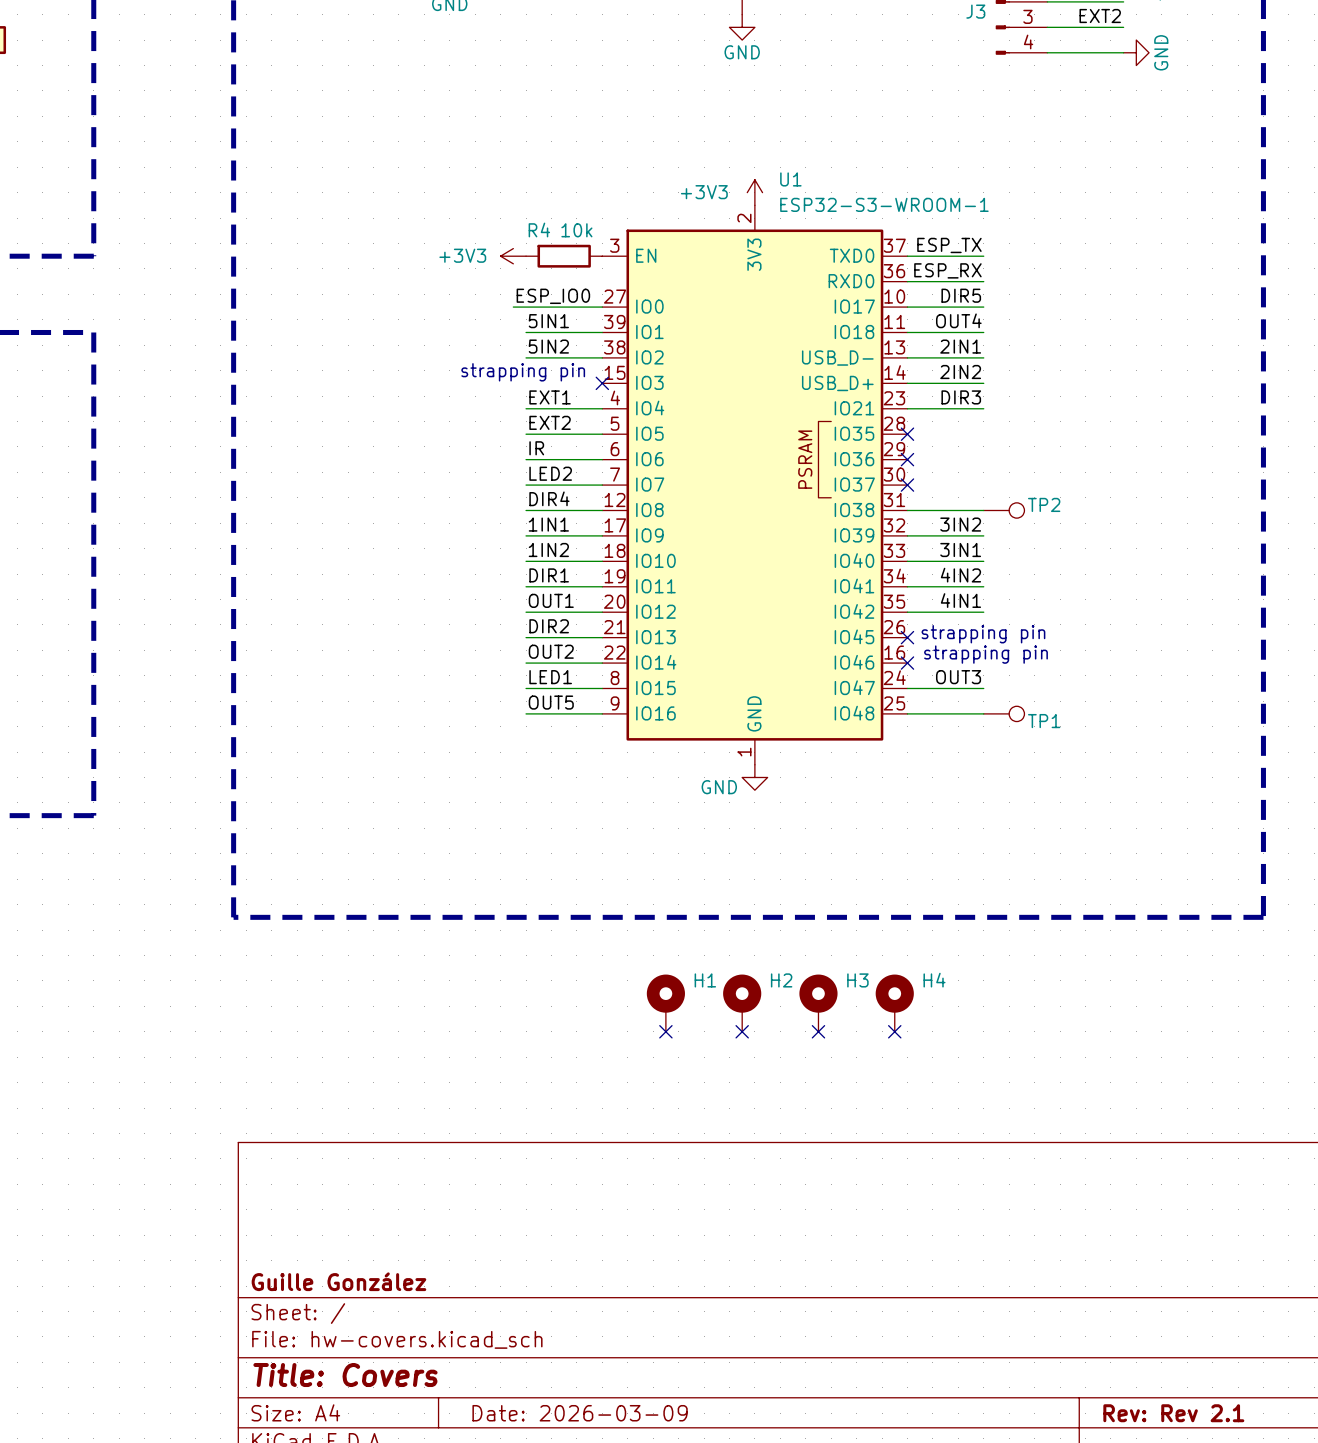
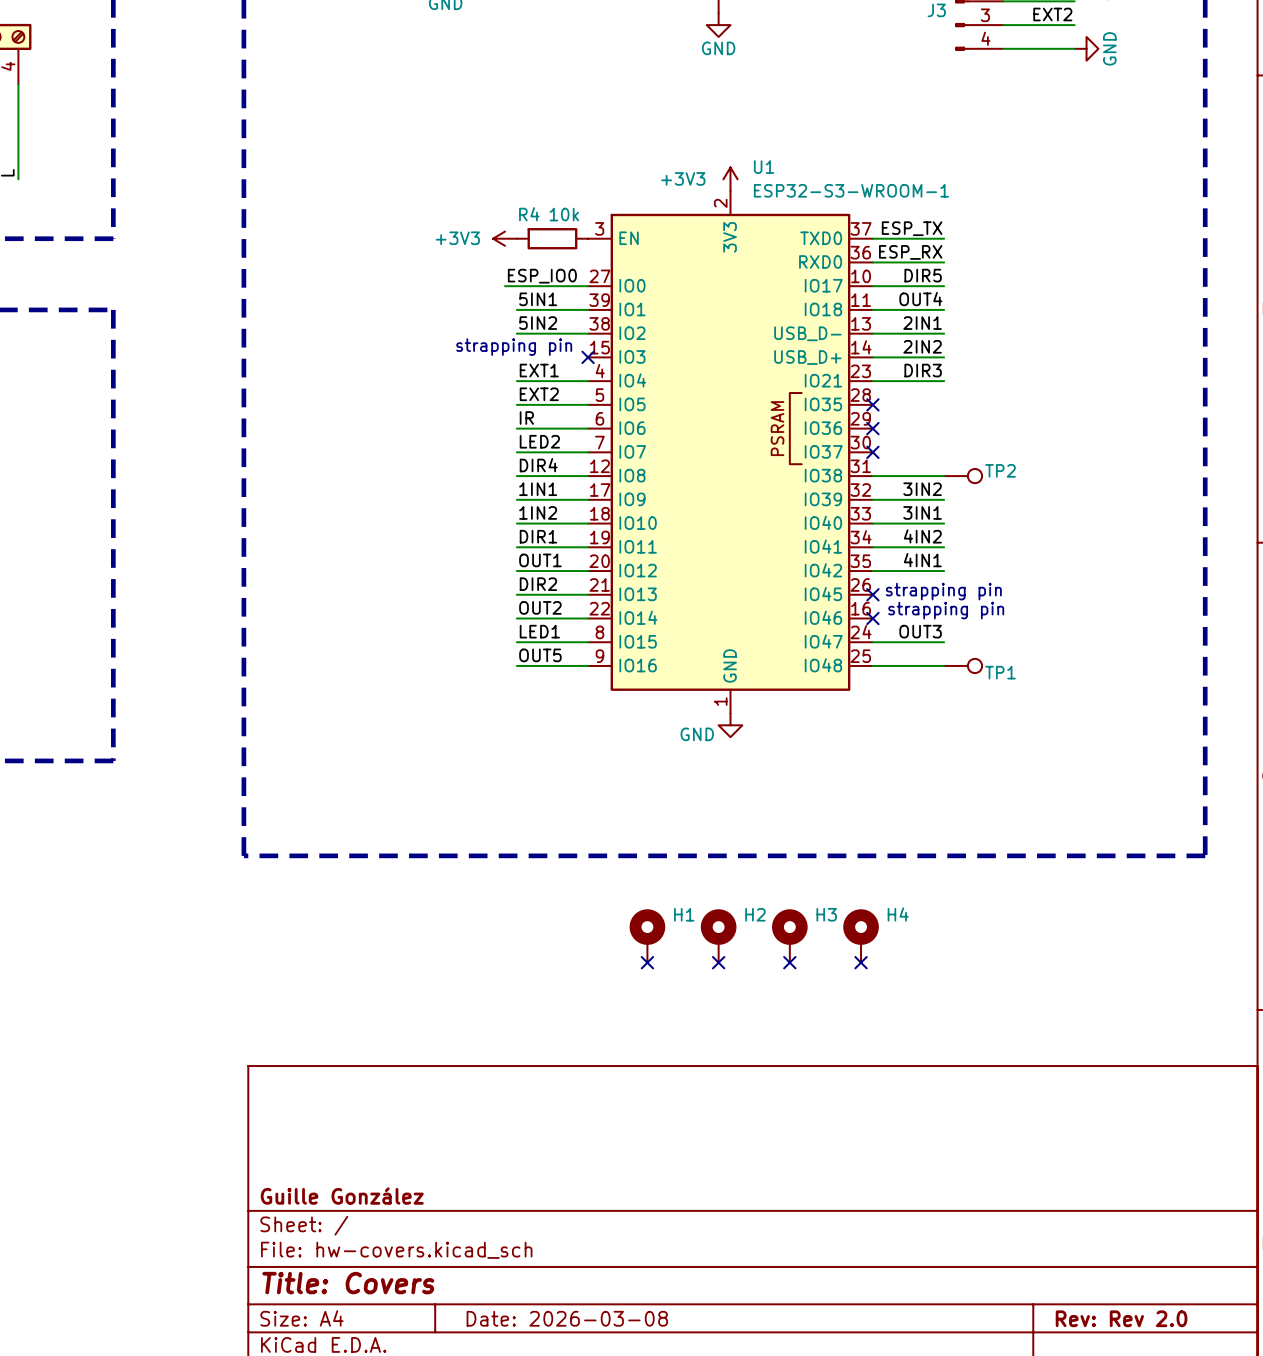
title block: Date: 2026-03-09 (580, 1413) -> Date: 2026-03-08 (567, 1318)
title block: Rev: Rev 2.1 (1173, 1413) -> Rev: Rev 2.0 (1121, 1318)

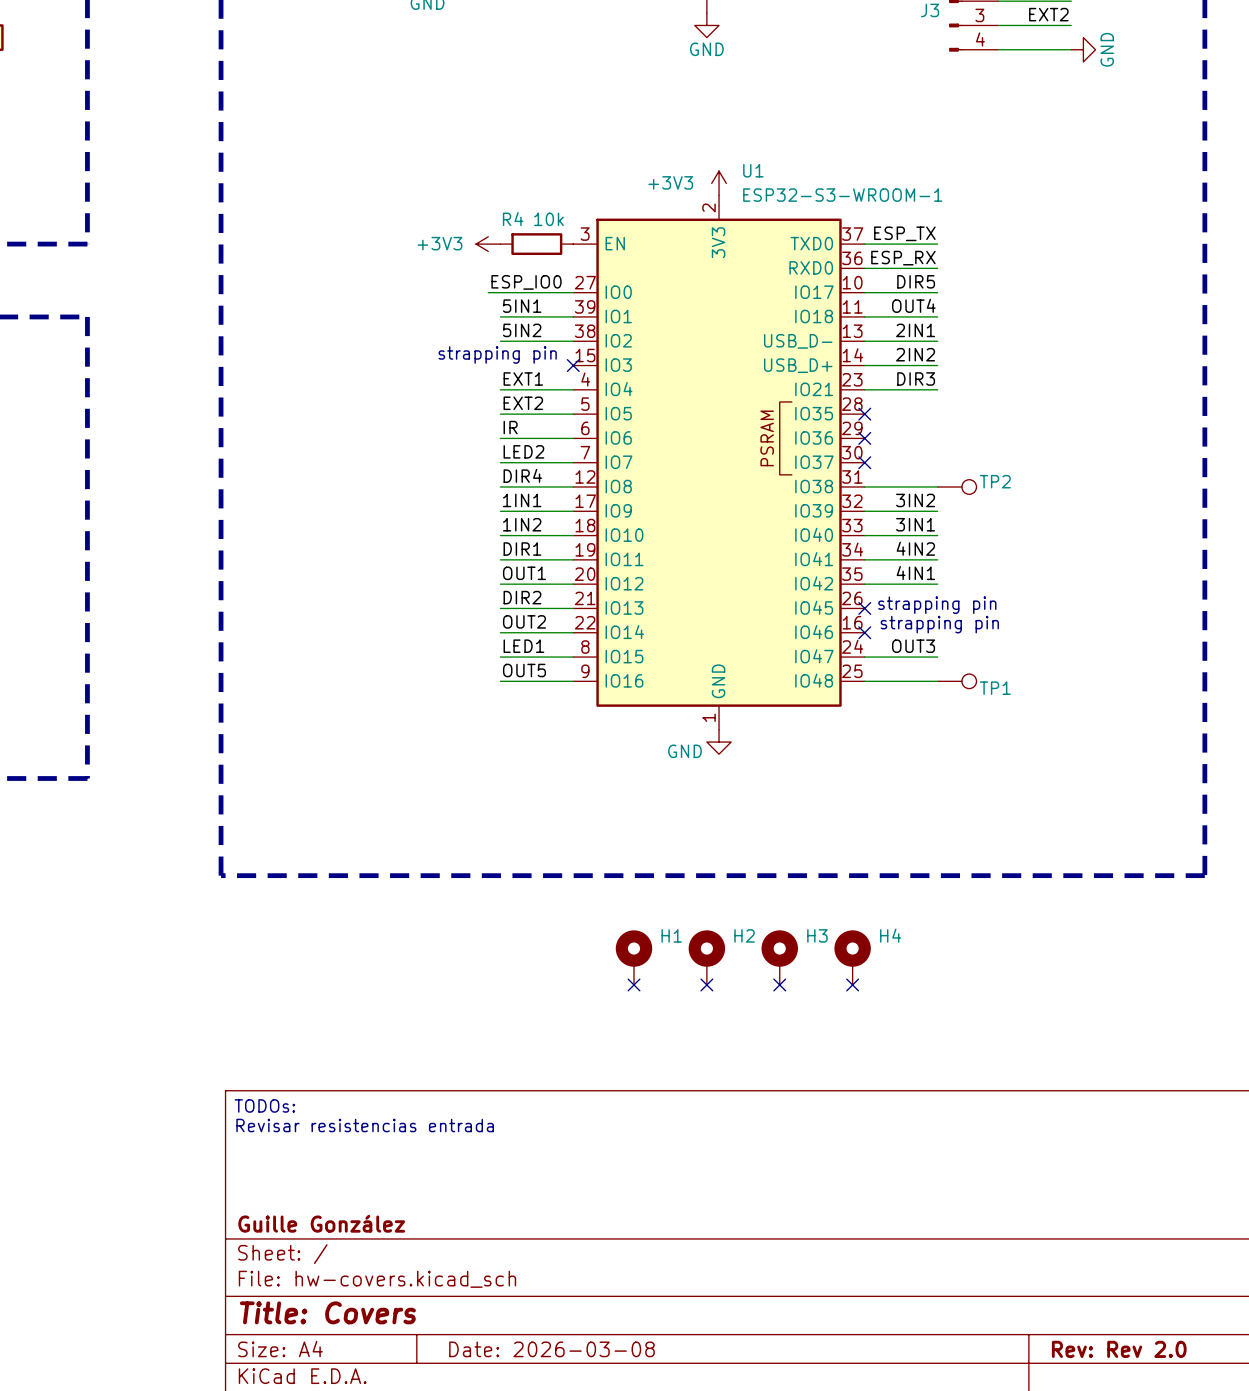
text: none -> TODOs: (264, 1105)
text: none -> Revisar resistencias entrada (365, 1125)

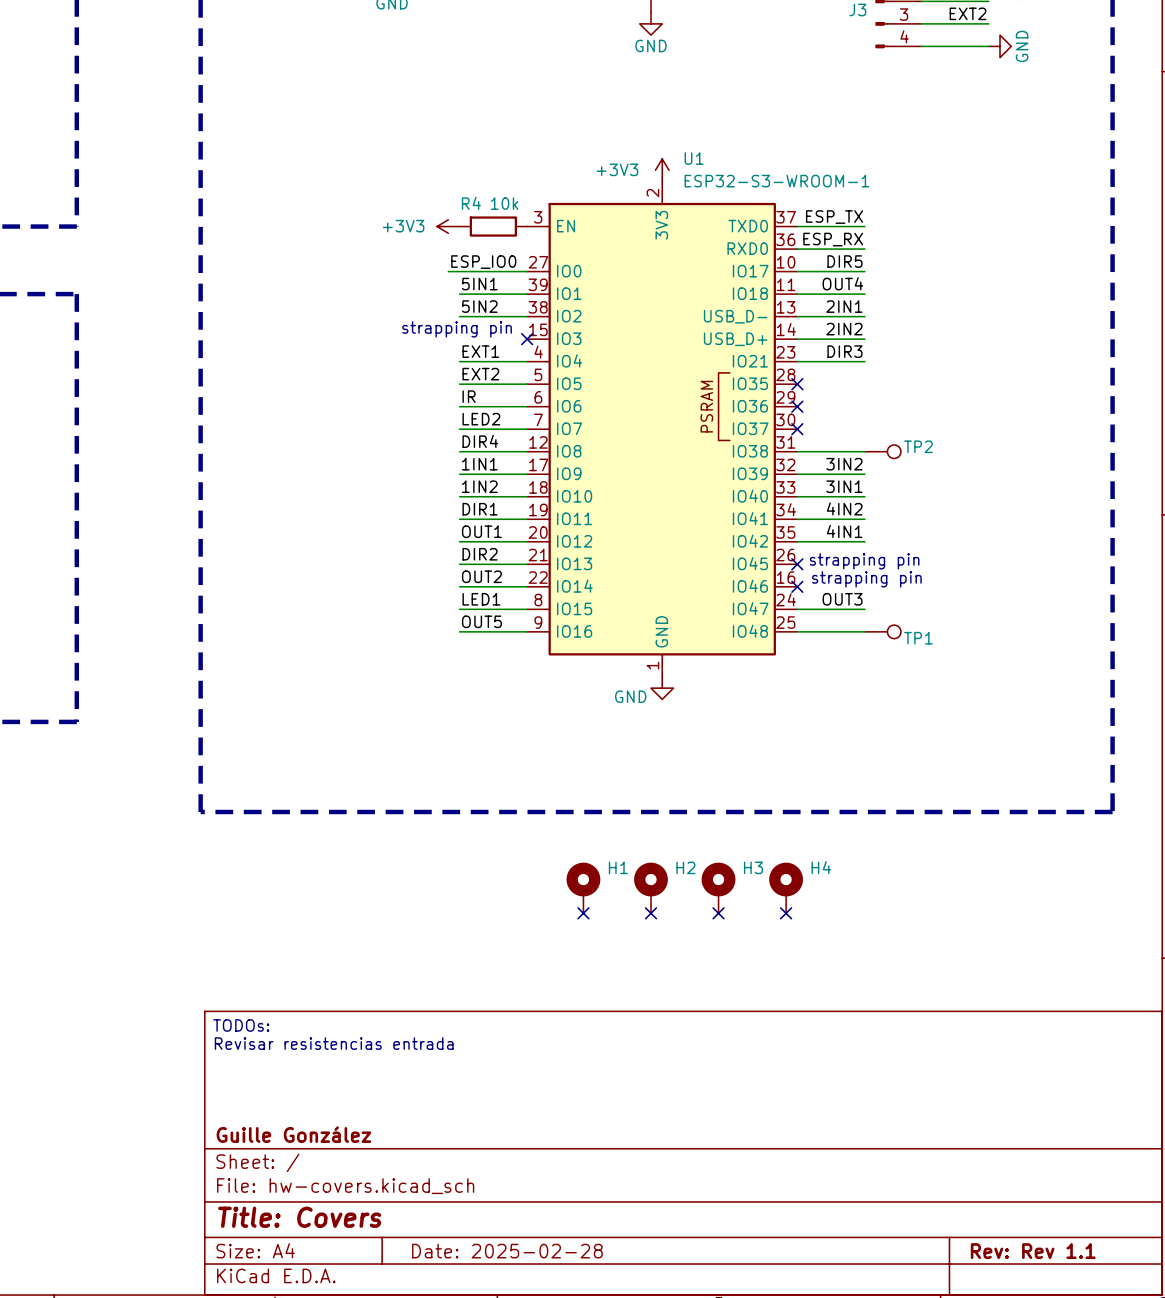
title block: Date: 2026-03-08 (552, 1349) -> Date: 2025-02-28 (507, 1251)
title block: Rev: Rev 2.0 (1119, 1349) -> Rev: Rev 1.1 (1033, 1251)

